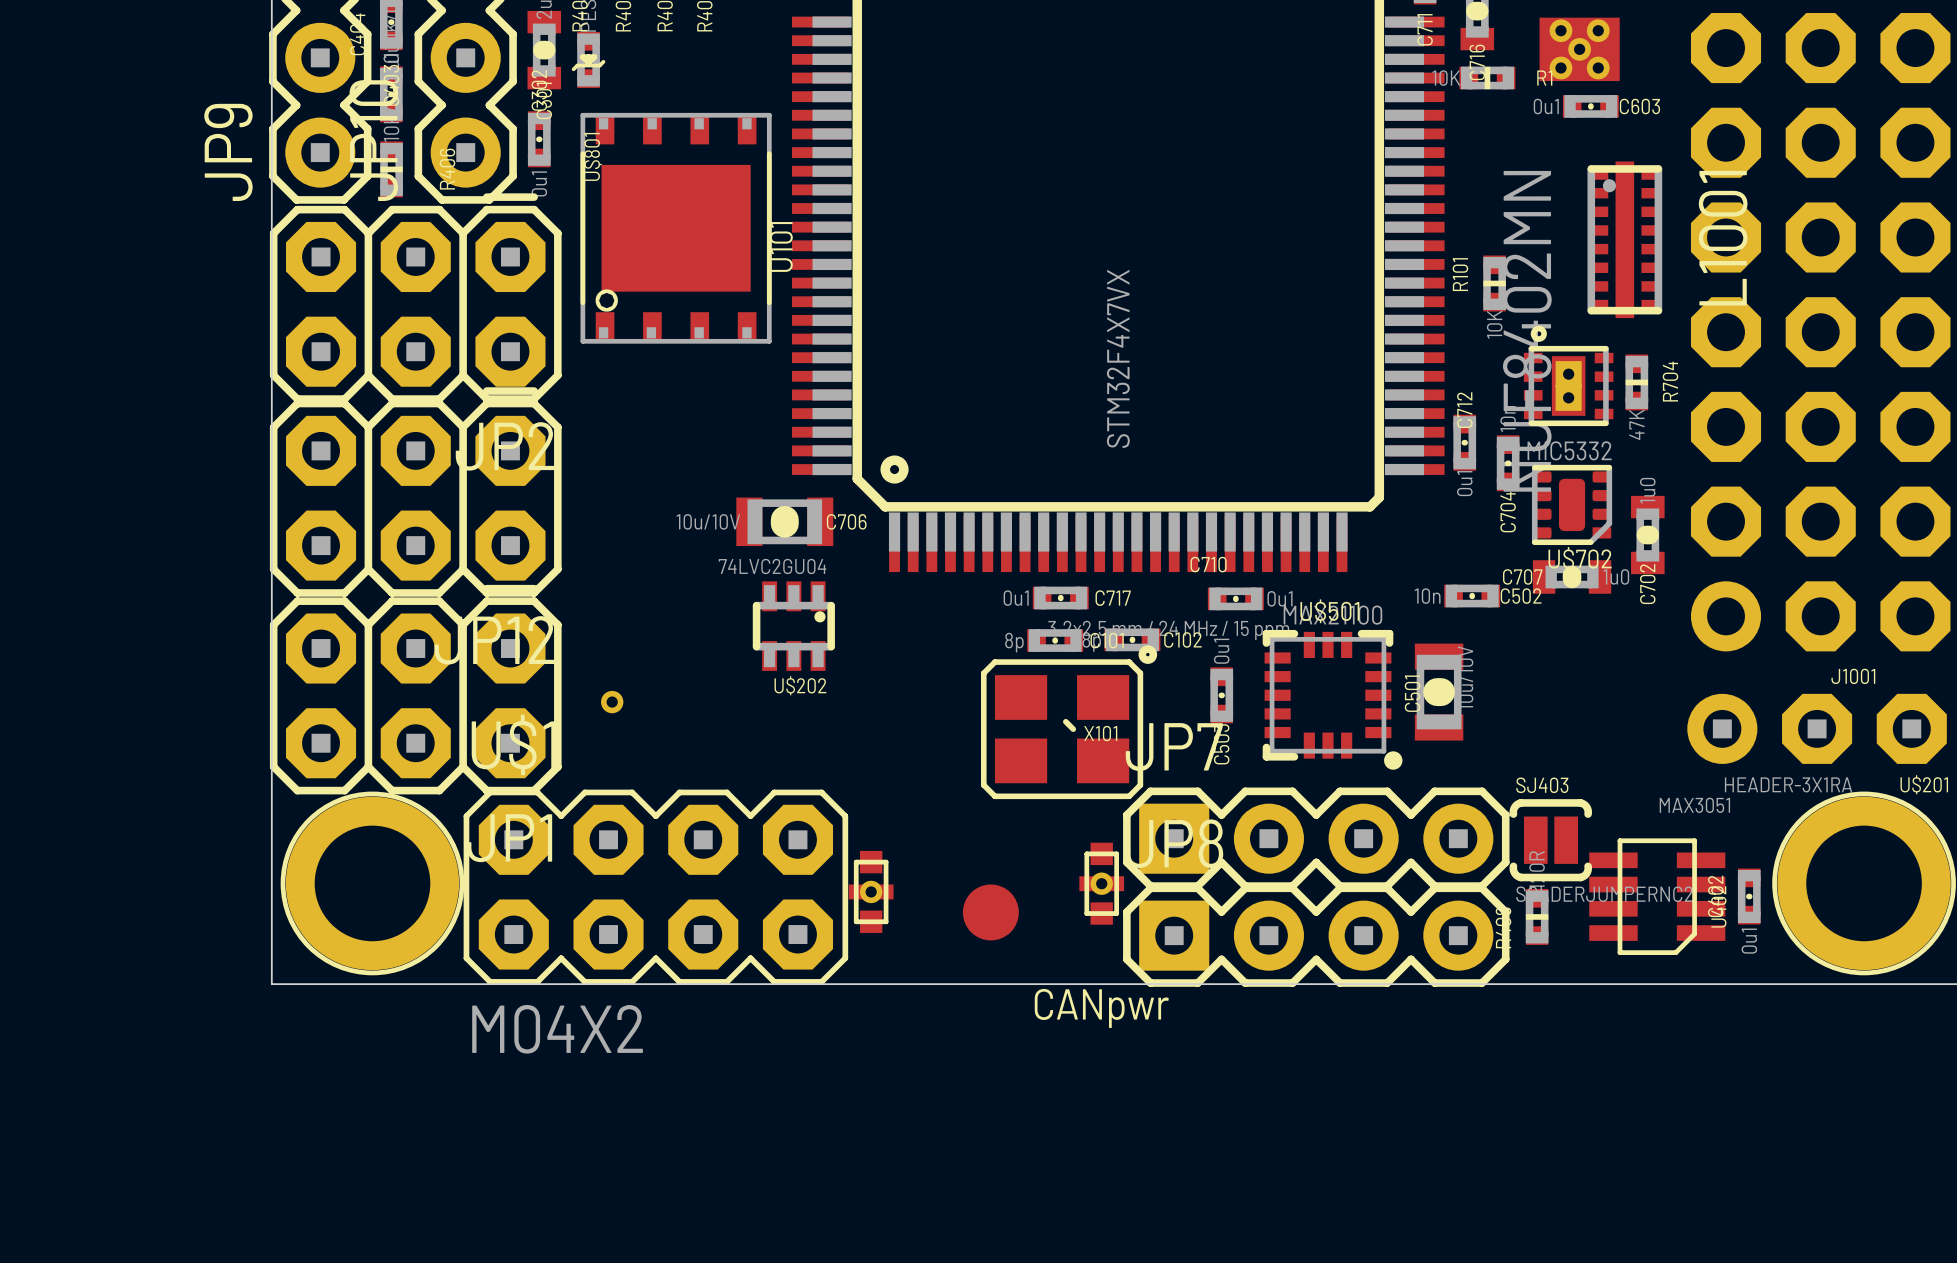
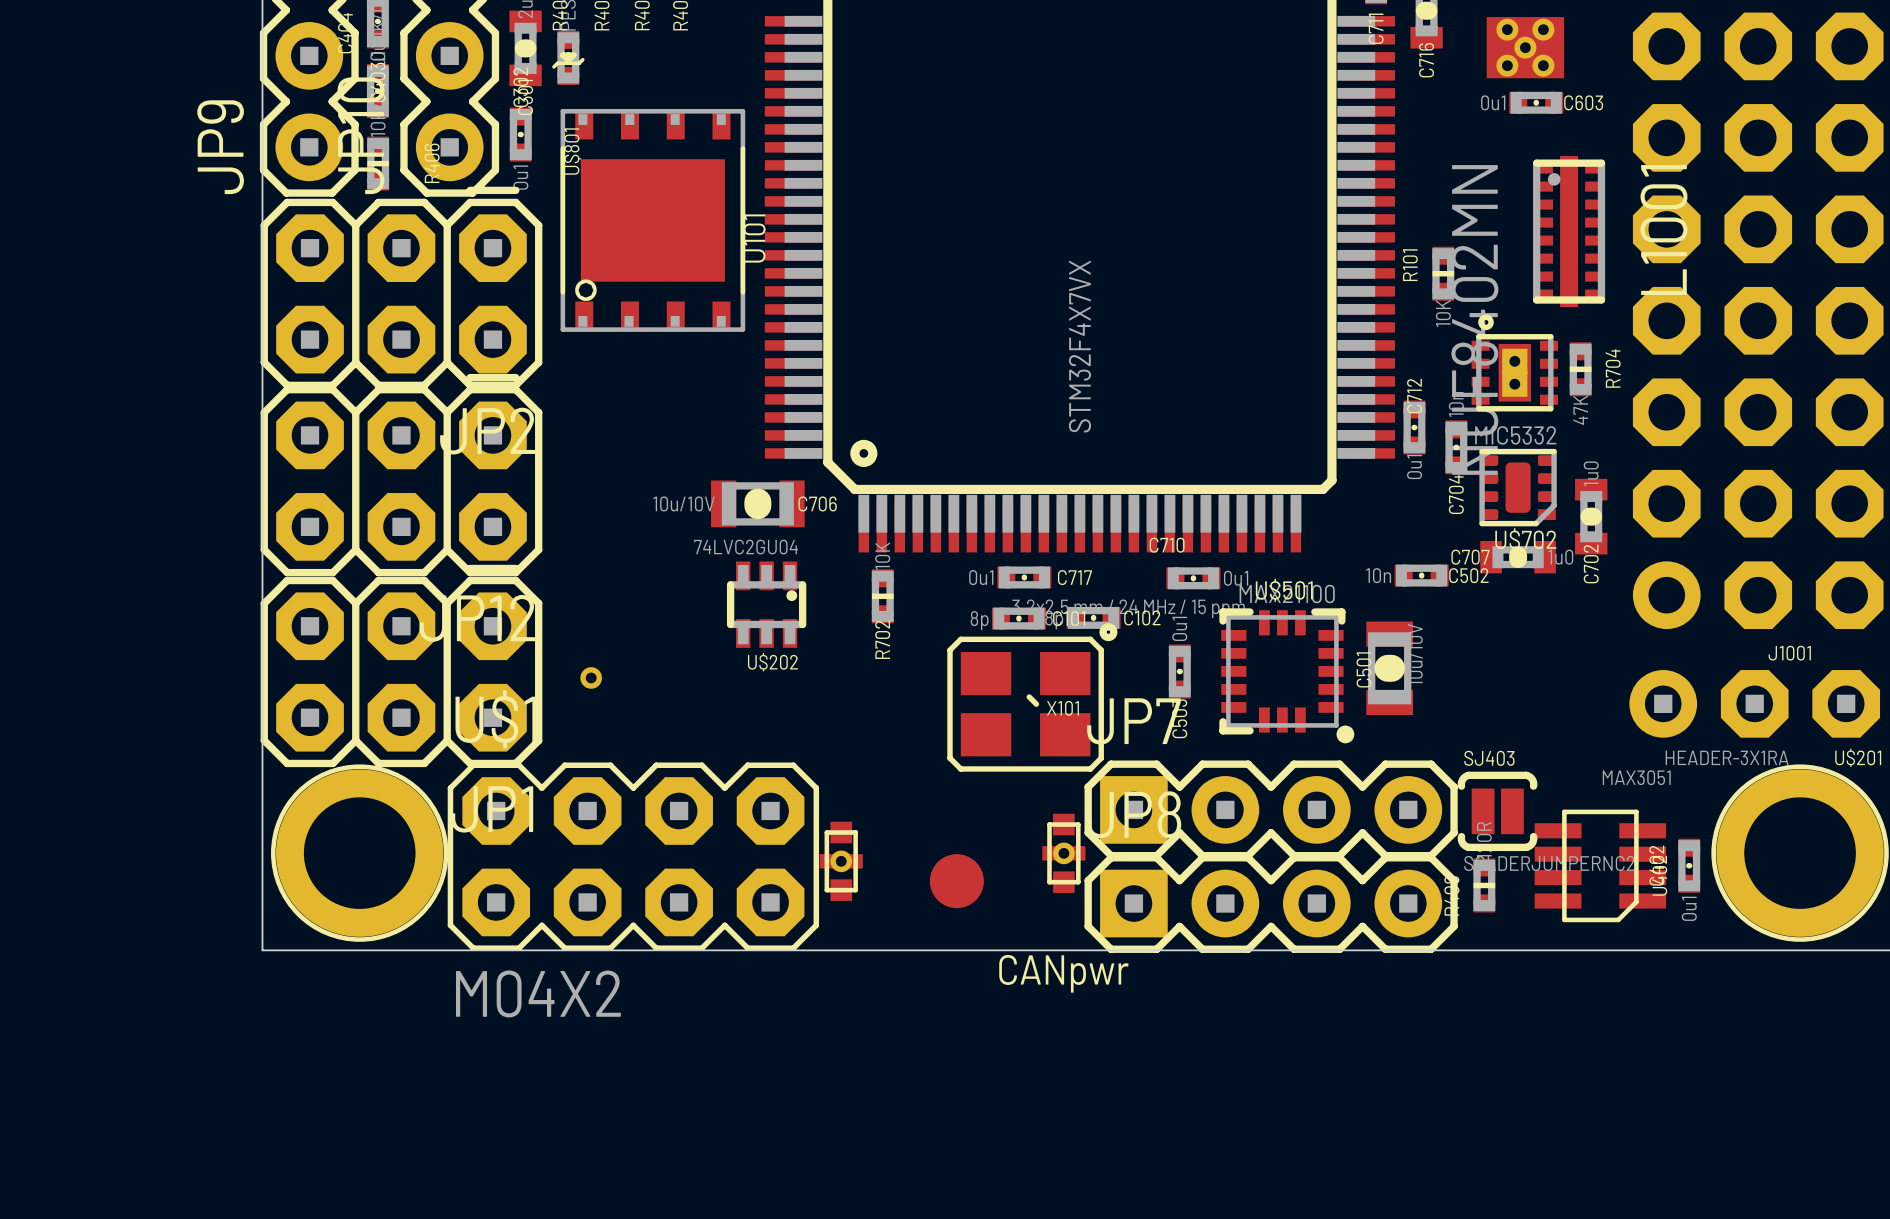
R1: 10K (1487, 78) -> none
R702: none -> 10K (882, 596)

